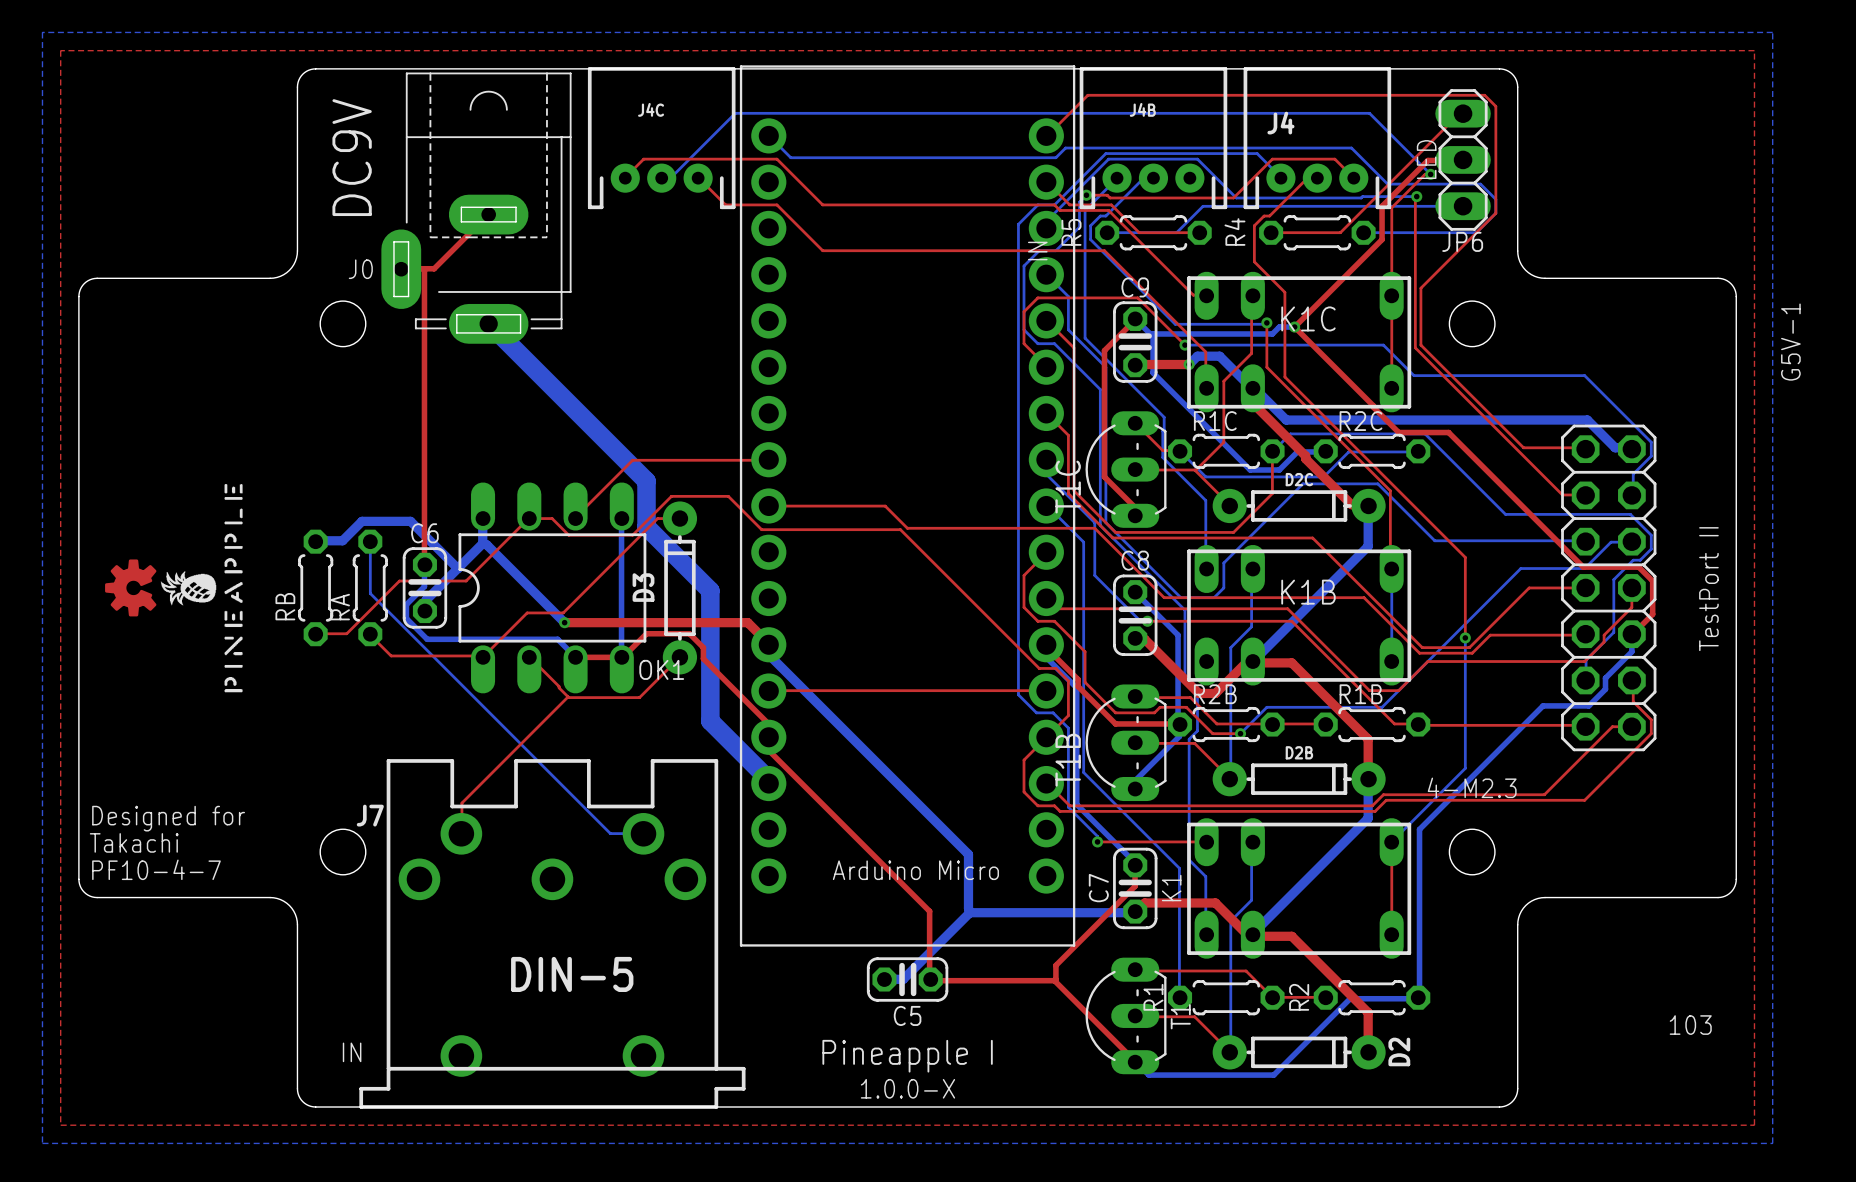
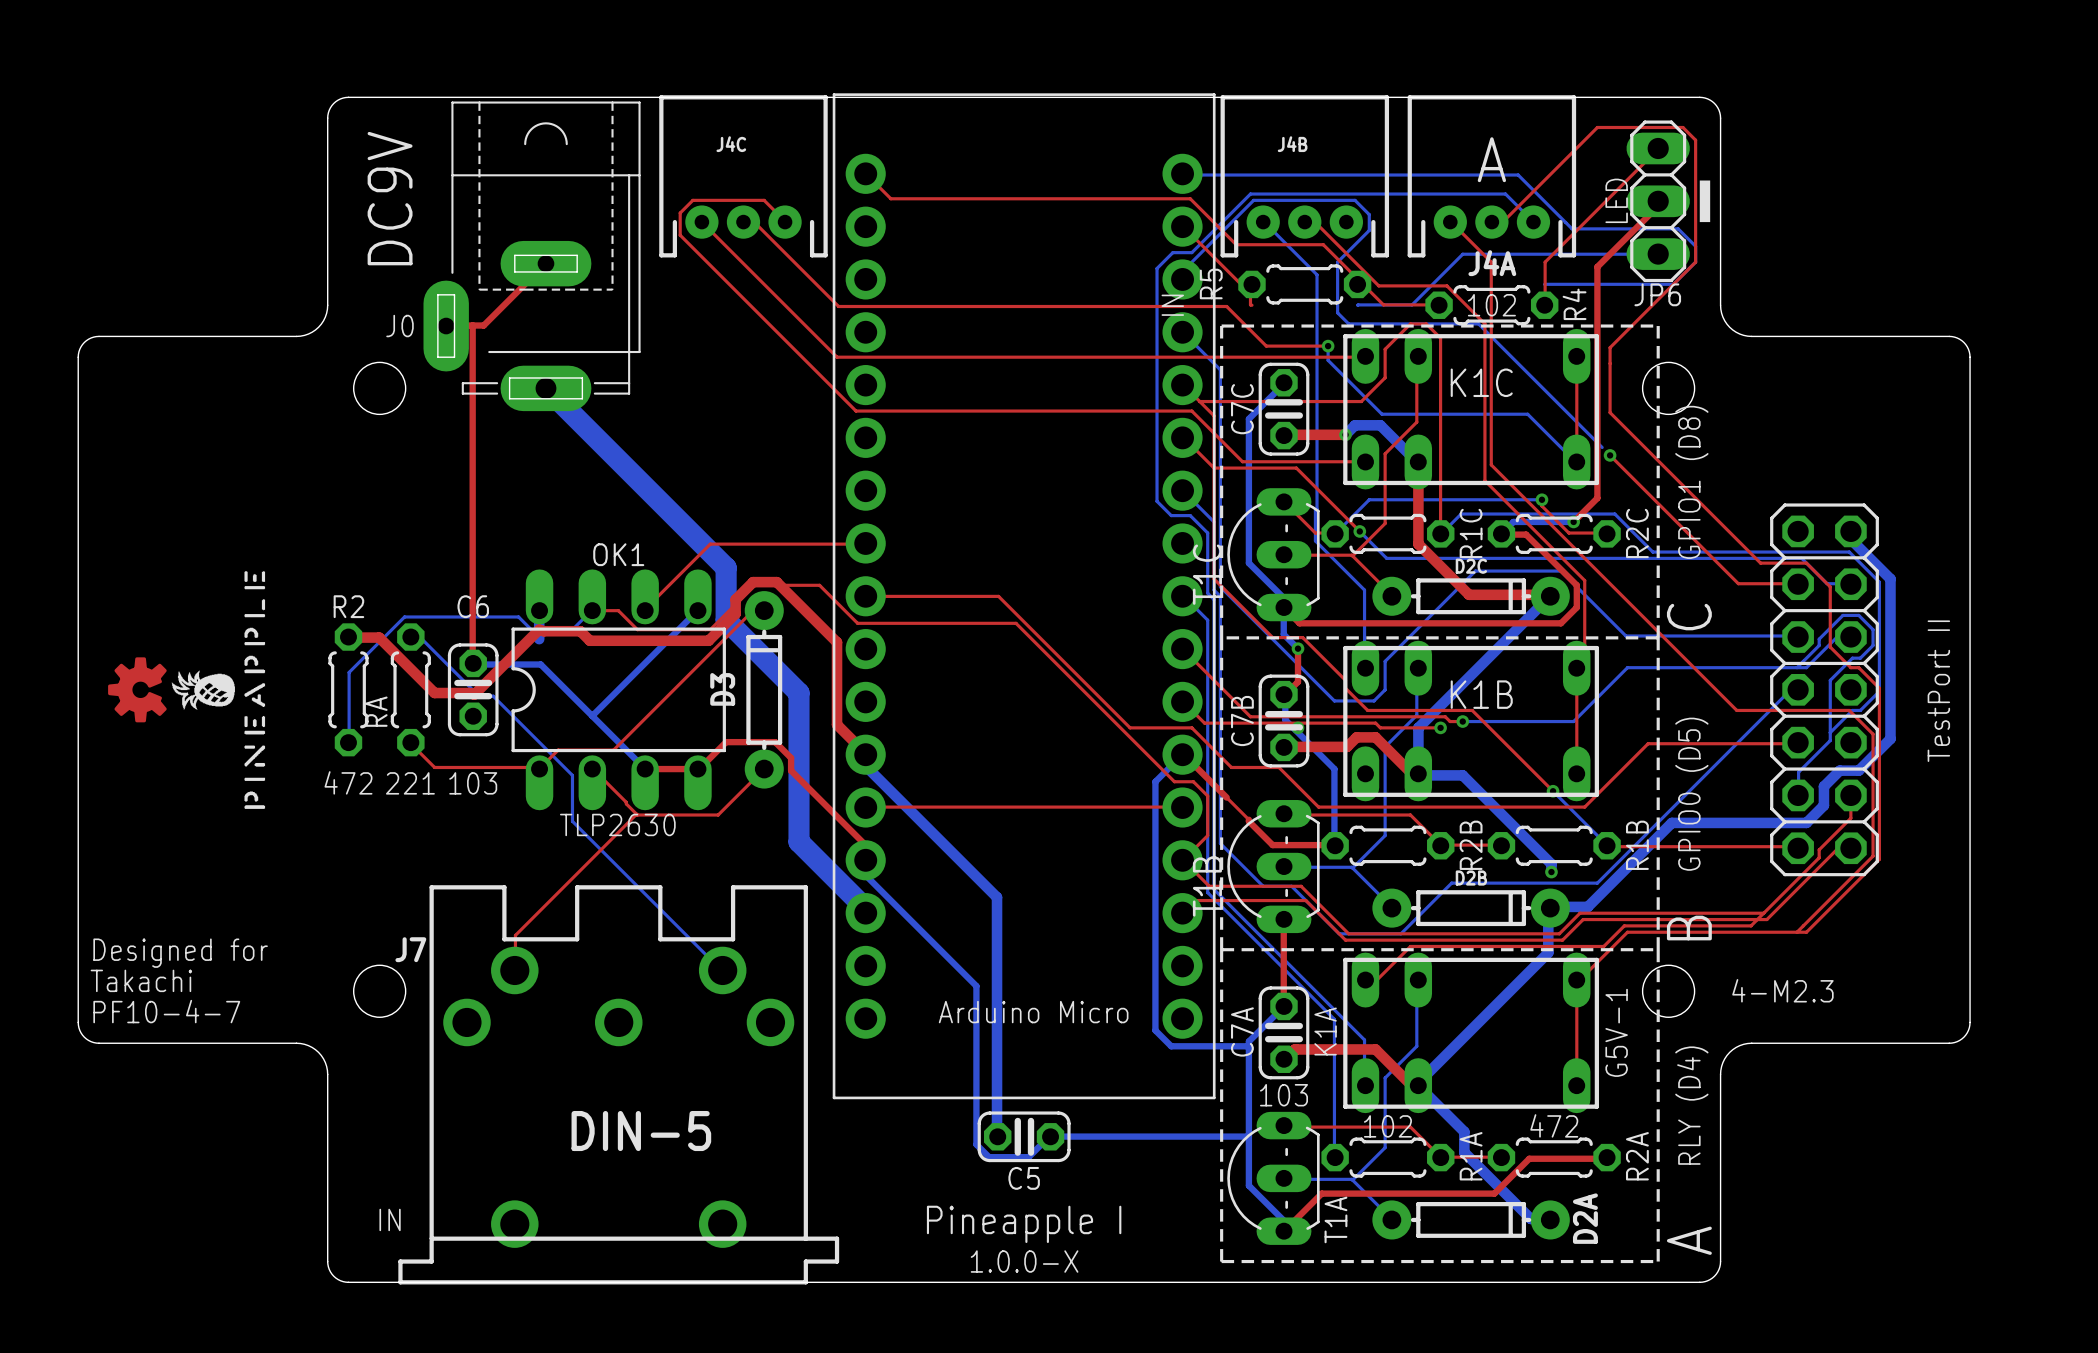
bottom zone outline: (42, 32) (1772, 32) (1772, 1143) (42, 1143) (42, 32) -> none
top zone outline: (60, 50) (1754, 50) (1754, 1125) (60, 1125) (60, 50) -> none
top track: (1409, 95) (1087, 95) (1046, 135) -> none
top track: (1462, 114) (1458, 114) (1340, 232) (1271, 232) -> (1657, 149) (1545, 262) (1544, 305)
J4 name: J4 (1280, 123) -> J4A (1492, 263)
text: none -> A (1491, 159)
bottom track: (768, 135) (790, 157) (1055, 157) (1065, 148) (1351, 148) -> (1182, 173) (1518, 175) (1530, 187)
drawing: none -> [1699, 180, 1711, 223]
bottom track: (1257, 153) (1280, 178) -> (1423, 194) (1505, 194) (1533, 222)
top track: (643, 159) (625, 178) -> none
top track: (679, 159) (776, 159) (822, 204) (1054, 204) (1060, 210) (1108, 210) (1193, 295) (1206, 295) -> (701, 222) (837, 357) (1365, 356)
top track: none -> (764, 200) (785, 222)
top track: (1462, 160) (1427, 160) (1382, 206) (1382, 239) (1294, 327) (1398, 432) (1448, 432) (1583, 567) (1638, 567) (1652, 581) (1652, 614) (1631, 634) -> (1657, 201) (1657, 206) (1597, 266) (1597, 498) (1573, 521)
bottom track: (1209, 171) (1236, 197) (1416, 196) -> (1369, 214) (1369, 230) (1337, 262) (1337, 312) (1348, 323) (1478, 323) (1567, 412)
top track: (1430, 174) (1425, 174) (1391, 207) (1391, 295) -> none
bottom track: (1430, 174) (1369, 113) (735, 113) (671, 177) (661, 178) -> none
via: (1430, 174) -> none
top track: none -> (743, 222) (754, 222) (838, 306) (1226, 306) (1266, 346) (1328, 346)
top track: (698, 178) (725, 204) (776, 204) (822, 250) (1104, 250) (1205, 352) (1205, 388) -> (722, 200) (692, 200) (680, 213) (680, 235) (856, 411) (1191, 411) (1242, 461) (1364, 461)
bottom track: (1117, 178) (1085, 210) (1085, 338) (1164, 417) -> (1263, 222) (1317, 274) (1317, 495)
top track: none -> (1304, 222) (1315, 222) (1378, 285) (1446, 285) (1484, 323) (1484, 480) (1584, 580) (1584, 659) (1576, 668) (1576, 773)
bottom track: (1153, 178) (1143, 178) (1105, 216) (1100, 216) (1090, 225) (1090, 239) (1175, 324) (1266, 322) -> none
top track: (1317, 178) (1307, 178) (1269, 216) (1264, 216) (1254, 225) (1254, 261) (1259, 267) -> (1491, 222) (1503, 220) (1597, 127)
top track: (1353, 178) (1334, 159) (1272, 159) (1233, 197) (1169, 197) -> (1438, 304) (1383, 304) (1323, 244)
top track: (1086, 195) (1107, 195) (1110, 197) -> (865, 173) (890, 198) (1190, 198) (1236, 244) (1255, 244)
bottom track: (1086, 195) (1079, 202) (1079, 227) (1055, 250) (1039, 250) (1024, 265) -> (1157, 268) (1157, 322)
via: (1086, 195) -> none
top track: (1416, 196) (1415, 347) (1562, 494) -> (1610, 455) (1738, 583) (1771, 583)
via: (1416, 196) -> none
top track: (1069, 204) (1111, 204) (1139, 232) (1199, 232) -> (1209, 252) (1250, 293) (1251, 305)
bottom track: (1291, 206) (1203, 206) (1176, 232) (1107, 232) -> (1462, 254) (1412, 304) (1357, 305)
bottom track: (1024, 218) (1018, 224) (1018, 694) (1036, 712) (1053, 712) (1068, 728) -> none
R4 name position: R4 (1234, 232) -> R4 (1574, 304)
R4 position: (1317, 232) -> (1491, 305)
text: none -> 102 (1491, 305)
top track: none -> (1426, 323) (1410, 323) (1385, 349) (1385, 377) (1361, 401) (1199, 401)
line: none -> (1221, 326) (1221, 1261) (1658, 1261) (1658, 326) (1221, 326)
top track: (1272, 279) (1284, 292) (1284, 377) (1465, 557) (1465, 637) -> (1440, 338) (1440, 533)
bottom track: none -> (1328, 346) (1328, 360) (1381, 414) (1527, 414) (1576, 461)
via: none -> (1328, 346)
C9 name: C9 (1135, 287) -> C7C (1242, 409)
bottom track: (1068, 296) (1068, 329) (1105, 367) (1105, 522) (1180, 597) -> (1207, 357) (1220, 369) (1220, 586) (1336, 700)
top track: (1135, 318) (1104, 350) (1104, 476) (1135, 507) (1135, 515) -> (1501, 533) (1526, 534) (1576, 585) (1576, 607) (1560, 623) (1299, 623) (1283, 607)
bottom track: (1135, 318) (1153, 336) (1153, 372) (1250, 469) (1279, 469) (1297, 451) (1325, 451) -> (1283, 382) (1248, 418) (1248, 563) (1283, 597) (1283, 607)
top track: (1266, 322) (1266, 367) (1390, 490) (1391, 569) -> none
via: (1266, 322) -> none
bottom track: (1294, 327) (1279, 327) (1272, 333) (1151, 335) -> none
via: (1294, 327) -> none
bottom track: (1024, 329) (1037, 343) (1054, 343) (1100, 389) (1100, 525) (1184, 610) (1184, 675) (1197, 687) (1197, 730) (1189, 739) (1189, 859) (1205, 876) (1205, 894) -> (1157, 395) (1157, 501) (1171, 515) (1190, 515) (1207, 533) (1207, 593) (1214, 599) (1214, 889) (1225, 900)
text: G5V-1 (1790, 342) -> none
top track: (1184, 345) (1137, 297) (1037, 297) (1024, 311) (1024, 343) (1046, 367) -> (1359, 531) (1296, 468) (1214, 468) (1182, 437)
bottom track: (1184, 345) (1383, 345) -> none
via: (1184, 345) -> none
bottom track: (1413, 375) (1584, 375) (1651, 442) (1651, 456) (1633, 474) (1631, 495) -> (1359, 531) (1386, 558) (1801, 558) (1827, 583) (1850, 584)
via: none -> (1610, 455)
bottom track: (1252, 388) (1286, 420) (1587, 420) (1615, 447) (1631, 449) -> (1418, 1085) (1419, 1081) (1548, 952) (1548, 913) (1551, 906) (1587, 906) (1671, 822) (1806, 822) (1823, 805) (1823, 786) (1839, 770) (1858, 770) (1890, 738) (1890, 578) (1852, 540) (1852, 531) (1850, 531)
top track: (1252, 403) (1351, 504) -> (1418, 479) (1418, 544) (1469, 594) (1530, 594)
text: none -> GPIO1 (D8) (1691, 482)
top track: (1046, 413) (1068, 435) (1068, 493) (1112, 538) (1312, 538) (1422, 647) (1469, 647) (1529, 587) (1585, 587) -> none
bottom track: none -> (1182, 490) (1214, 521) (1214, 590) (1220, 596) (1220, 843) (1263, 886) (1291, 886) (1339, 933) (1400, 933) (1451, 883) (1597, 883) (1790, 689) (1798, 689)
R1C name rotation: 0° (1215, 421) -> 90° counterclockwise (1471, 533)
R1C name position: R1C (1215, 421) -> R1C (1471, 533)
top track: none -> (1541, 499) (1541, 506) (1568, 533) (1607, 533)
R2C name rotation: 0° (1361, 421) -> 90° counterclockwise (1637, 533)
R2C name position: R2C (1361, 421) -> R2C (1637, 533)
via: none -> (1541, 499)
bottom track: none -> (1573, 521) (1513, 521) (1501, 533)
via: none -> (1573, 521)
top track: (1523, 447) (1585, 449) -> (1727, 529) (1760, 563) (1806, 563) (1830, 586) (1830, 647) (1850, 667) (1858, 667) (1879, 688) (1879, 859) (1806, 932) (1797, 932)
via: none -> (1359, 531)
bottom track: (1180, 451) (1205, 476) (1323, 476) (1348, 451) (1418, 451) -> (1335, 533) (1369, 499) (1541, 499)
top track: (1272, 451) (1272, 493) (1233, 532) (1115, 532) -> (1553, 791) (1472, 710) (1367, 710) (1345, 688) (1345, 680) (1302, 637) (1272, 637) (1261, 626)
bottom track: (1046, 459) (1047, 475) (1094, 522) (1094, 575) (1140, 621) (1147, 621) -> none
bottom track: (1458, 467) (1505, 514) (1630, 514) (1638, 522) -> (1652, 552) (1849, 552) (1879, 582) (1879, 691) (1860, 710) (1852, 710) (1830, 732)
bottom track: (1368, 506) (1368, 546) (1252, 661) -> (1549, 596) (1418, 727) (1418, 773)
bottom track: none -> (1283, 607) (1283, 634) (1298, 648)
top track: (529, 518) (466, 581) (399, 581) (346, 633) (315, 634) -> none
bottom track: none -> (592, 610) (572, 629) (531, 629) (518, 616) (404, 616) (349, 672) (348, 742)
bottom track: (621, 518) (621, 657) -> (697, 610) (592, 716)
top track: (670, 518) (657, 518) (654, 521) -> (841, 729) (837, 724) (837, 642) (776, 582) (753, 582) (735, 599) (735, 613)
top track width: thin (654, 521) (631, 544) -> thick (735, 613) (708, 640)
bottom track: none -> (1858, 615) (1842, 615) (1819, 639) (1819, 645)
text: none -> C (1689, 617)
bottom track: (1068, 526) (1083, 542) (1083, 772) -> (1207, 620) (1207, 849)
top track: (907, 528) (1094, 528) (1164, 597) (1364, 597) (1419, 653) (1472, 653) (1490, 635) -> none
C6 name position: C6 (424, 533) -> C6 (473, 606)
top track: none -> (348, 637) (379, 637) (434, 693) (474, 694) (539, 629) (580, 631) (589, 640) (708, 640)
bottom track: (315, 541) (342, 540) (362, 521) (410, 521) (457, 568) -> none
bottom track: (370, 542) (370, 593) (610, 833) (642, 833) -> (410, 637) (420, 637) (479, 696) (493, 696) (572, 775) (572, 821) (721, 970)
line: none -> (1221, 637) (1658, 637)
bottom track: (1619, 542) (1611, 542) (1604, 549) -> (1836, 637) (1806, 667) (1797, 667)
top track: (631, 544) (563, 612) (527, 612) (499, 640) -> (753, 610) (613, 750) (558, 750)
top track: none -> (1298, 648) (1298, 681) (1283, 694)
via: none -> (1298, 648)
top track: (1046, 552) (1024, 575) (1024, 607) (1037, 621) -> (1023, 621) (1130, 727) (1172, 727)
top track: none -> (1182, 649) (1250, 716) (1445, 716) (1450, 721) (1462, 721)
C8 name: C8 (1135, 560) -> C7B (1242, 721)
bottom track: (424, 564) (424, 586) (406, 604) (406, 618) (427, 639) (557, 639) -> (473, 663) (540, 664) (624, 748)
bottom track: (1520, 568) (1382, 707) (1266, 707) (1240, 733) -> (1724, 667) (1627, 667) (1573, 721) (1462, 721)
bottom track: (1391, 569) (1391, 661) -> none
top track: (1631, 587) (1631, 607) (1604, 635) (1604, 642) (1584, 661) (1427, 661) -> (1689, 743) (1648, 743) (1618, 773)
bottom track: (1136, 593) (1178, 635) (1178, 722) (1180, 724) (1179, 736) (1136, 779) (1135, 789) -> (1285, 696) (1285, 719) (1334, 769) (1335, 845)
RB name: RB (285, 606) -> R2 (348, 606)
top track: (1057, 608) (1287, 608) (1369, 690) -> (1226, 762) (1231, 767) (1279, 767) (1318, 807) (1551, 807)
bottom track: (1251, 610) (1251, 626) (1230, 647) (1229, 779) -> (1416, 715) (1385, 746) (1385, 835) (1352, 868)
bottom track: (424, 611) (425, 600) (482, 543) (486, 544) (564, 622) -> none
via: none -> (1462, 721)
top track: (1147, 621) (1219, 621) -> (1195, 713) (1204, 723) (1375, 723) (1380, 727)
top track: (1272, 621) (1291, 621) (1394, 723) (1418, 724) -> none
via: none -> (1440, 727)
top track: (564, 622) (747, 622) -> none
via: (564, 622) -> none
bottom track: (1631, 634) (1631, 651) (1605, 678) (1605, 689) (1588, 705) (1543, 705) (1419, 829) (1418, 998) (1350, 998) (1273, 1075) (1148, 1075) (1135, 1062) -> (1283, 1006) (1248, 1041) (1248, 1185) (1283, 1220) (1283, 1231)
bottom track: (1465, 637) (1465, 768) (1391, 841) -> none
via: (1465, 637) -> none
top track: (1135, 638) (1144, 639) (1198, 693) (1215, 693) (1246, 662) (1291, 662) (1368, 739) (1368, 779) -> (1283, 747) (1347, 746) (1356, 737) (1375, 737) (1412, 773) (1418, 773)
bottom track: (1046, 644) (1047, 658) (1076, 687) (1076, 804) (1136, 864) (1135, 865) -> (1182, 754) (1155, 781) (1155, 1030) (1171, 1046) (1248, 1046)
top track: (1047, 644) (1047, 649) (1078, 679) (1078, 686) (1115, 723) (1125, 723) -> (1248, 819) (1272, 845)
top track: (1085, 651) (1085, 682) -> (1183, 754) (1226, 797)
bottom track: none -> (1418, 773) (1462, 775) (1551, 864) (1551, 872)
text: none -> 472 (348, 782)
text: none -> 221 (410, 783)
text: none -> 103 (473, 783)
OK1 name position: OK1 (661, 669) -> OK1 (618, 554)
bottom track: none -> (1553, 791) (1607, 845)
via: none -> (1553, 791)
text: none -> GPIO0 (D5) (1691, 794)
top track: (1631, 680) (1633, 701) (1651, 719) -> (1450, 222) (1491, 262) (1491, 464) (1736, 710) (1849, 710) (1873, 734) (1873, 840)
R2B name rotation: 0° (1215, 694) -> 90° counterclockwise (1471, 845)
R2B name position: R2B (1215, 694) -> R2B (1471, 845)
R1B name rotation: 0° (1361, 694) -> 90° counterclockwise (1637, 845)
R1B name position: R1B (1361, 694) -> R1B (1637, 845)
top track: (1190, 697) (1216, 723) (1272, 723) -> (1347, 815) (1410, 815) (1440, 845)
top track: (1104, 701) (1115, 712) (1154, 712) (1160, 707) (1186, 707) (1212, 733) (1240, 733) -> none
text: none -> TLP2630 (617, 824)
top track: (1620, 726) (1612, 726) (1604, 735) -> (1850, 795) (1850, 818) (1819, 849) (1819, 857)
top track: none -> (1838, 848) (1766, 919) (1583, 919) (1570, 932)
via: (1240, 733) -> none
top track: (768, 737) (770, 751) (929, 911) (931, 980) (1054, 980) -> none
bottom track: none -> (865, 860) (867, 876) (976, 986) (976, 1144) (989, 1157) (1028, 1157) (1050, 1136)
top track: (1046, 737) (1024, 760) (1024, 791) (1037, 805) (1054, 805) (1060, 811) (1375, 811) (1379, 807) -> (1182, 860) (1209, 886) (1301, 886) (1348, 933) (1559, 933)
top track: (1135, 742) (1194, 743) (1229, 779) -> none
bottom track: none -> (1283, 866) (1351, 867) (1391, 908)
via: none -> (1551, 872)
bottom track: (1068, 765) (1068, 807) (1097, 836) (1097, 841) -> (1207, 892) (1334, 1019)
bottom track: (883, 769) (968, 854) (969, 912) -> (997, 897) (997, 1136)
bottom track: (1368, 779) (1368, 818) (1252, 934) -> (1550, 1219) (1530, 1218) (1464, 1152) (1464, 1131) (1418, 1085)
top track: (1046, 783) (1069, 805) (1372, 805) (1376, 801) -> (1182, 913) (1195, 900) (1305, 900) (1345, 940) (1562, 940)
text position: 4-M2.3 (1472, 787) -> 4-M2.3 (1782, 990)
top track: (1383, 794) (1433, 794) -> (1567, 925) (1579, 913) (1763, 913)
text: none -> B (1689, 928)
top track: (1386, 800) (1436, 800) -> (1576, 980) (1578, 981) (1627, 932)
line: none -> (1221, 949) (1658, 949)
top track: (1097, 841) (1206, 842) -> (1624, 925) (1603, 946) (1410, 946) (1377, 979) (1365, 980)
via: (1097, 841) -> none
top track: (1135, 865) (1135, 886) (1055, 965) (1054, 980) -> (1283, 1006) (1283, 919)
bottom track: (1179, 868) (1179, 876) -> (1334, 1009) (1364, 1039)
C7 name: C7 (1098, 888) -> C7A (1242, 1031)
K1 name: K1 (1171, 888) -> K1A (1325, 1031)
text: none -> G5V-1 (1616, 1032)
bottom track: (1135, 911) (969, 912) -> none
bottom track: (969, 912) (903, 979) (884, 979) -> none
bottom track: (1230, 921) (1229, 1052) -> (1393, 1070) (1385, 1077) (1385, 1147) (1352, 1180)
top track: (1252, 934) (1291, 936) (1368, 1012) (1368, 1052) -> none
text: none -> 103 (1283, 1095)
text: none -> RLY (D4) (1691, 1105)
text: none -> 472 (1554, 1125)
text: none -> 102 (1387, 1126)
bottom track: none -> (1050, 1136) (1248, 1136)
top track: (1054, 980) (1135, 1062) -> (1607, 1157) (1529, 1158) (1494, 1193) (1321, 1193) (1283, 1231)
R1 name: R1 (1153, 997) -> R1A (1471, 1156)
R2 name: R2 (1299, 997) -> R2A (1637, 1156)
top track: (1135, 1015) (1194, 1016) (1229, 1052) -> none
bottom track: none -> (1283, 1178) (1351, 1179) (1391, 1219)
T1 name: T1 (1180, 1016) -> T1A (1335, 1219)
text: 103 (1690, 1025) -> none
D2 name: D2 (1399, 1051) -> D2A (1585, 1218)
text: none -> A (1689, 1240)

